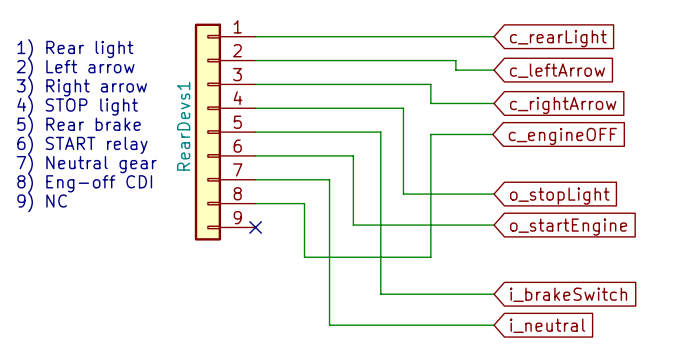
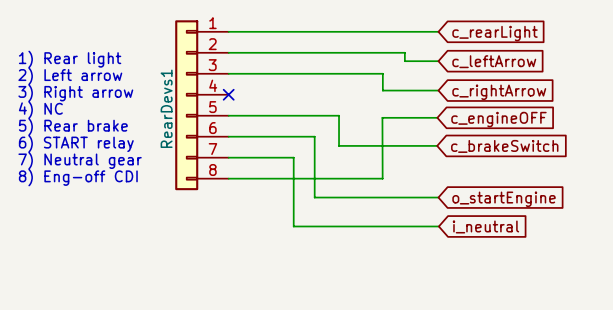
RearDevs1 symbol: [194, 23, 256, 241] -> [175, 20, 229, 191]
text: 1) Rear light (75, 48) -> none
text: 2) Left arrow (75, 68) -> 1) Rear light (70, 59)
text: 3) Right arrow (81, 87) -> 2) Left arrow (70, 76)
text: 4) STOP light (77, 106) -> 3) Right arrow (75, 93)
wire: (255, 108) (403, 108) (403, 194) (494, 194) -> none
no-connect mark: none -> (228, 94)
text: 5) Rear brake (79, 125) -> 4) NC (40, 110)
wire: (380, 132) (380, 294) (494, 294) -> (338, 115) (339, 145) (437, 145)
wire: (430, 134) (430, 257) (304, 257) (304, 203) -> (382, 117) (382, 178) (271, 178)
text: 6) START relay (82, 144) -> 5) Rear brake (73, 126)
text: 7) Neutral gear (86, 164) -> 6) START relay (76, 143)
global label: none -> c_brakeSwitch (504, 146)
text: 8) Eng-off CDI (84, 183) -> 7) Neutral gear (80, 160)
global label: o_stopLight (559, 196) -> none
text: 9) NC (42, 202) -> 8) Eng-off CDI (78, 177)
no-connect mark: (255, 227) -> none
wire: (329, 257) (329, 325) (494, 325) -> (293, 226) (438, 226)
global label: i_brakeSwitch (568, 294) -> none
global label position: i_neutral (547, 325) -> i_neutral (485, 226)

